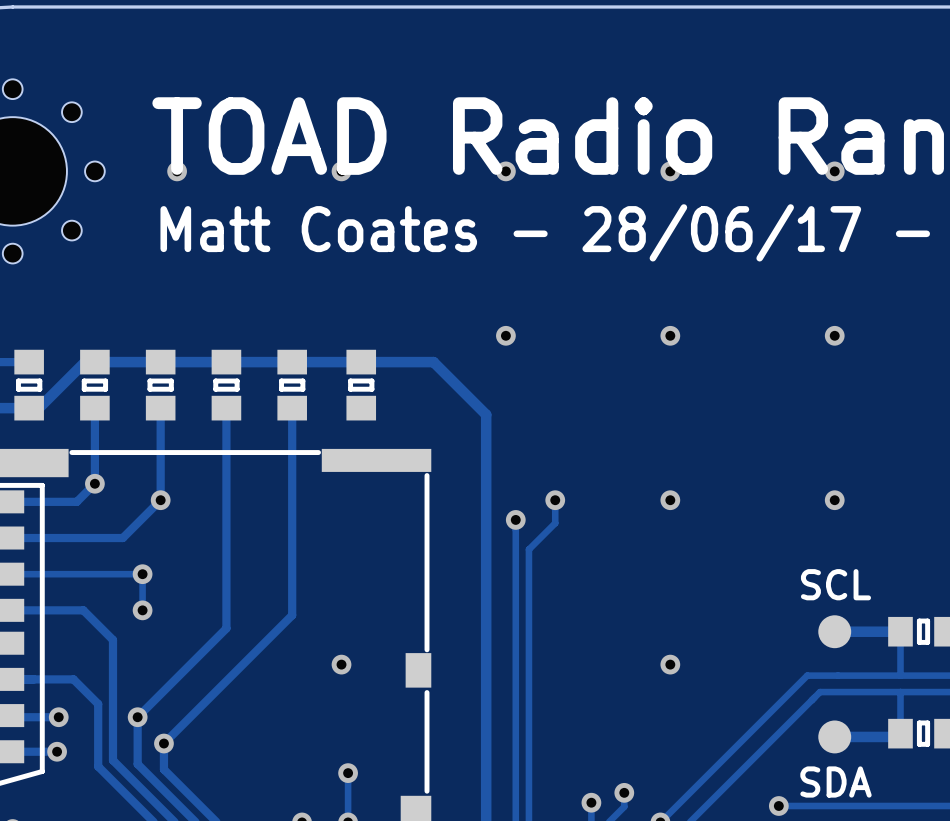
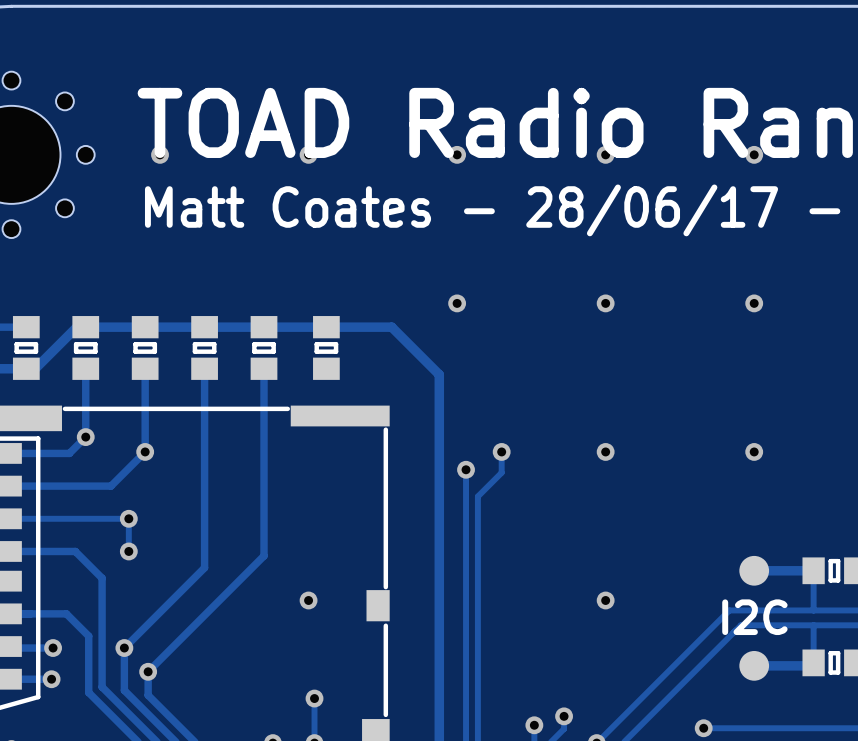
text: SCL (835, 584) -> none
text: none -> I2C (754, 617)
text: SDA (835, 782) -> none

